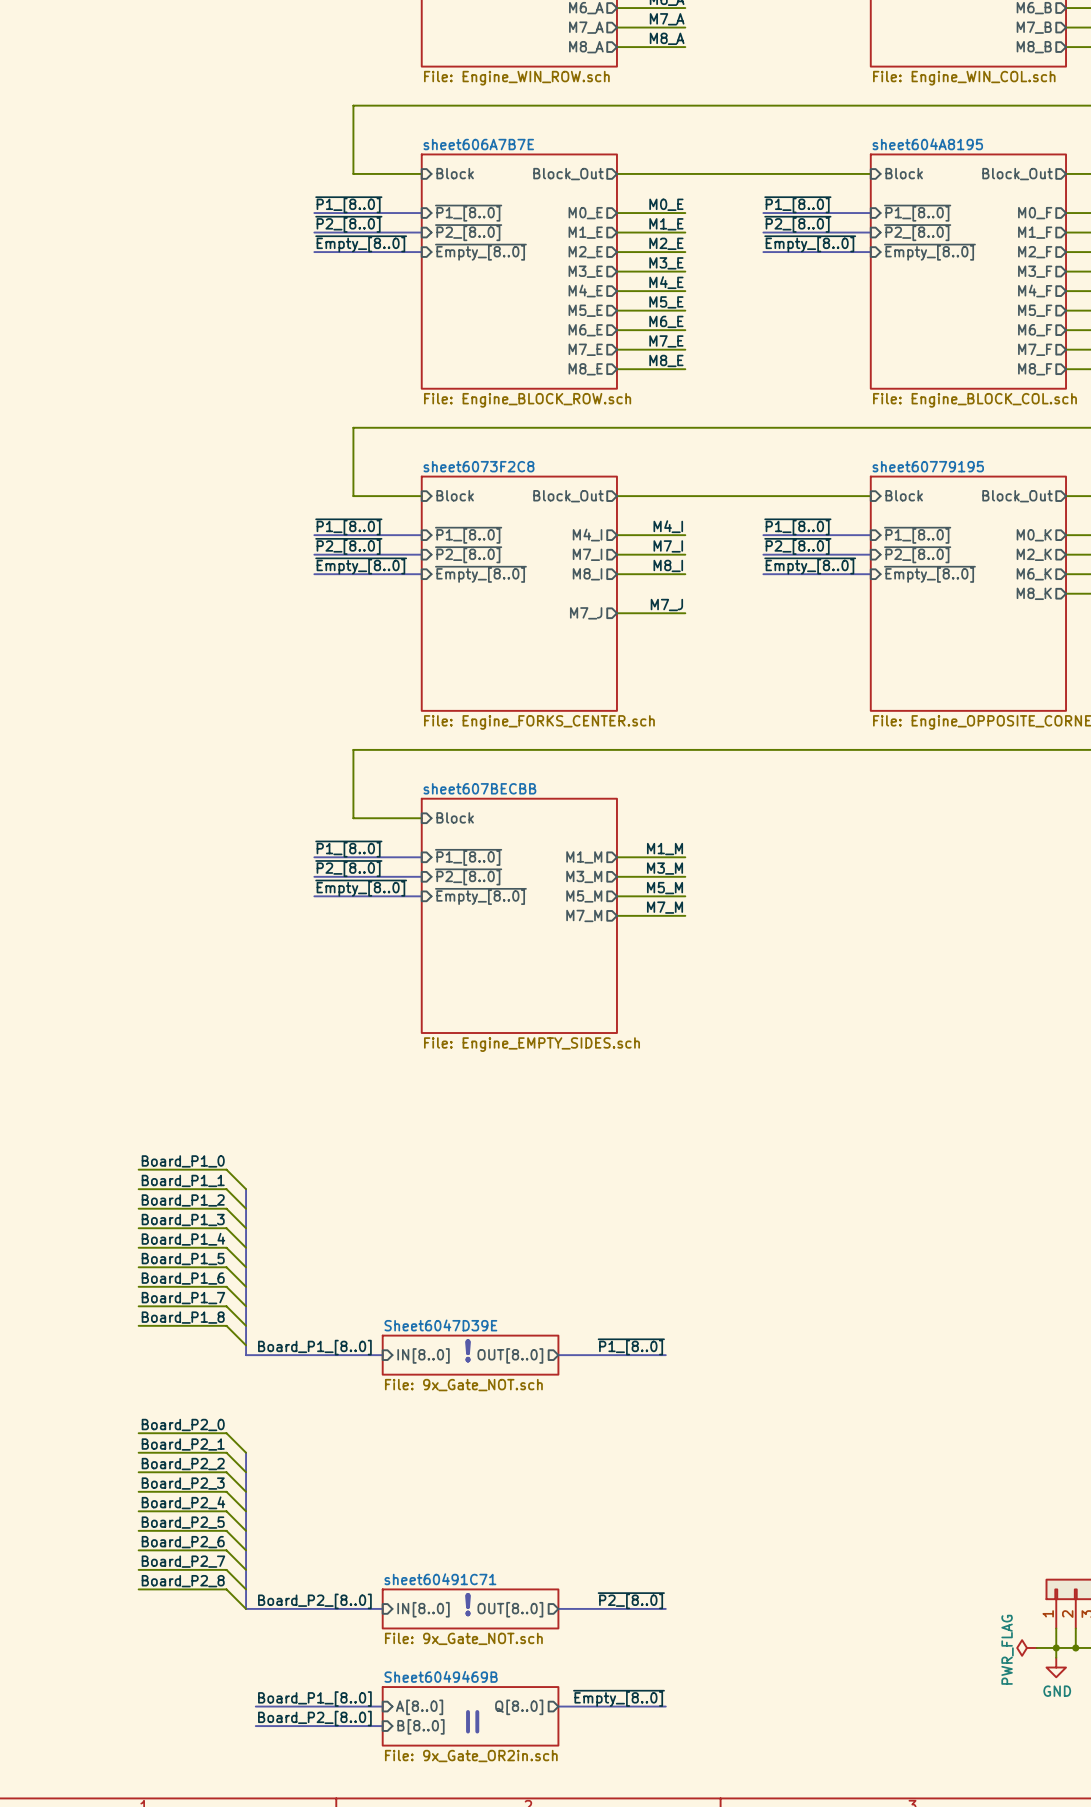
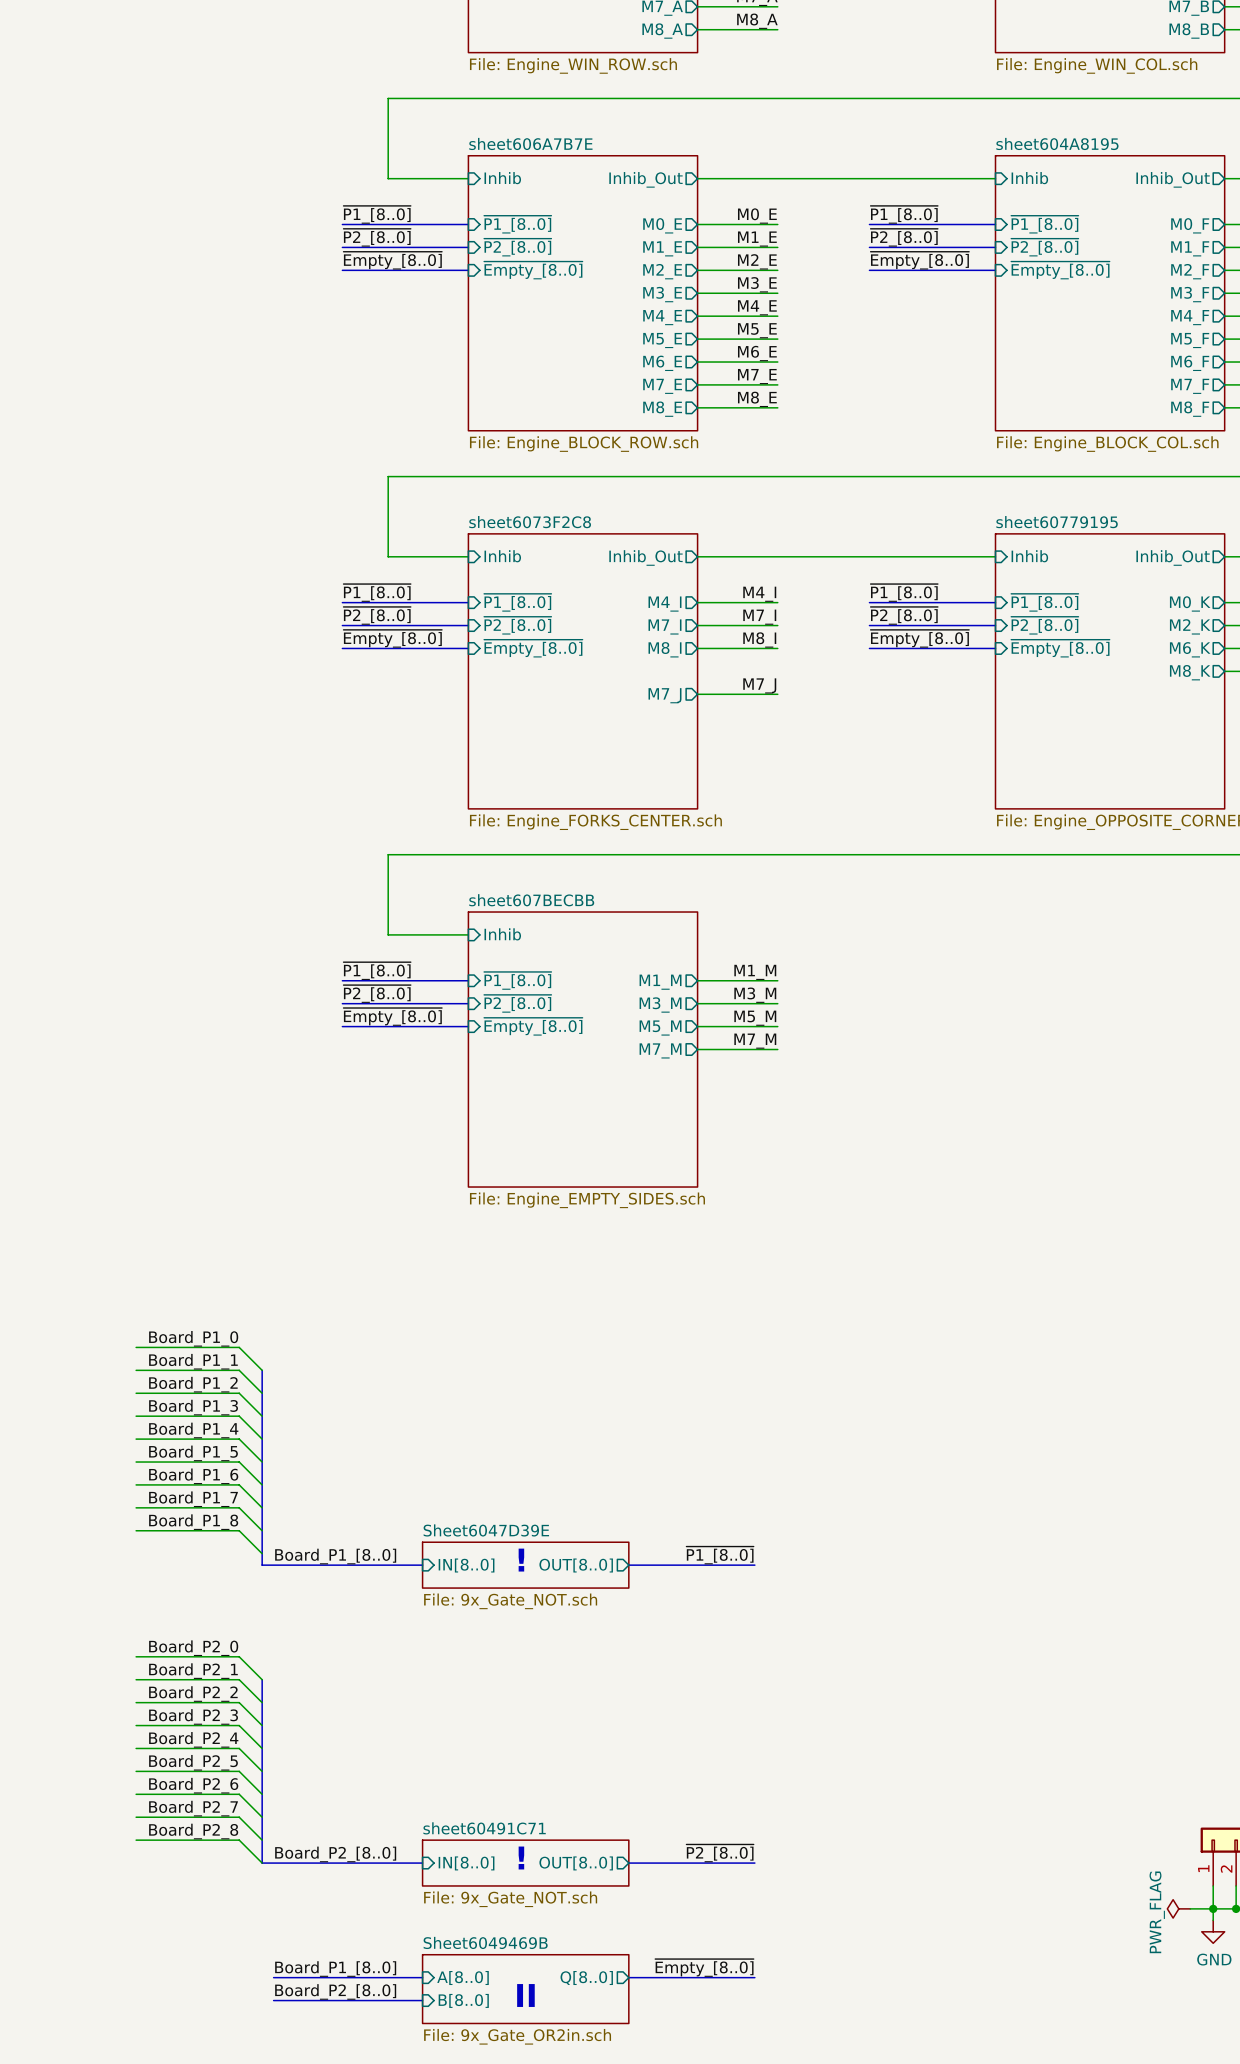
sheet pin: Block (455, 173) -> Inhib (502, 178)
sheet pin: Block (904, 173) -> Inhib (1029, 178)
sheet pin: Block_Out (568, 174) -> Inhib_Out (645, 179)
sheet pin: Block_Out (1017, 174) -> Inhib_Out (1173, 179)
sheet pin: Block (455, 495) -> Inhib (502, 556)
sheet pin: Block (904, 495) -> Inhib (1029, 556)
sheet pin: Block_Out (568, 496) -> Inhib_Out (645, 557)
sheet pin: Block_Out (1017, 496) -> Inhib_Out (1173, 557)
sheet pin: Block (455, 817) -> Inhib (502, 934)

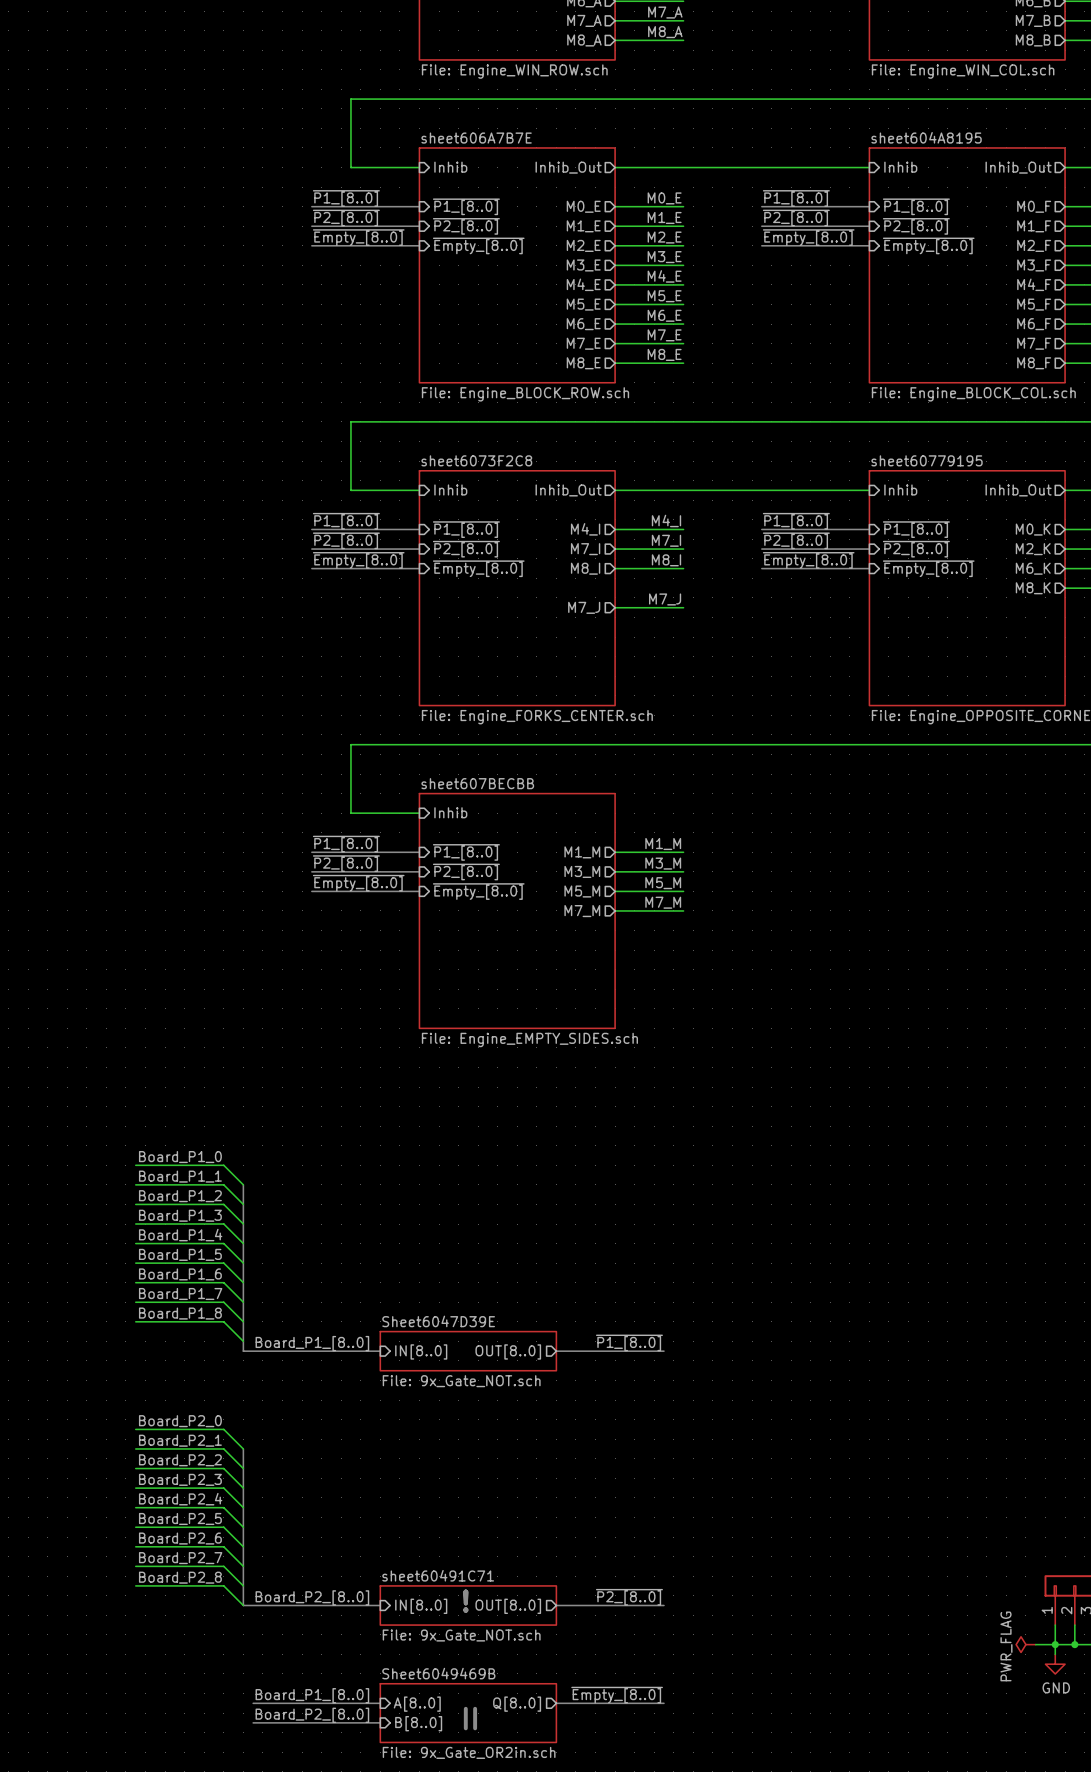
text: ! (521, 1560) -> none

